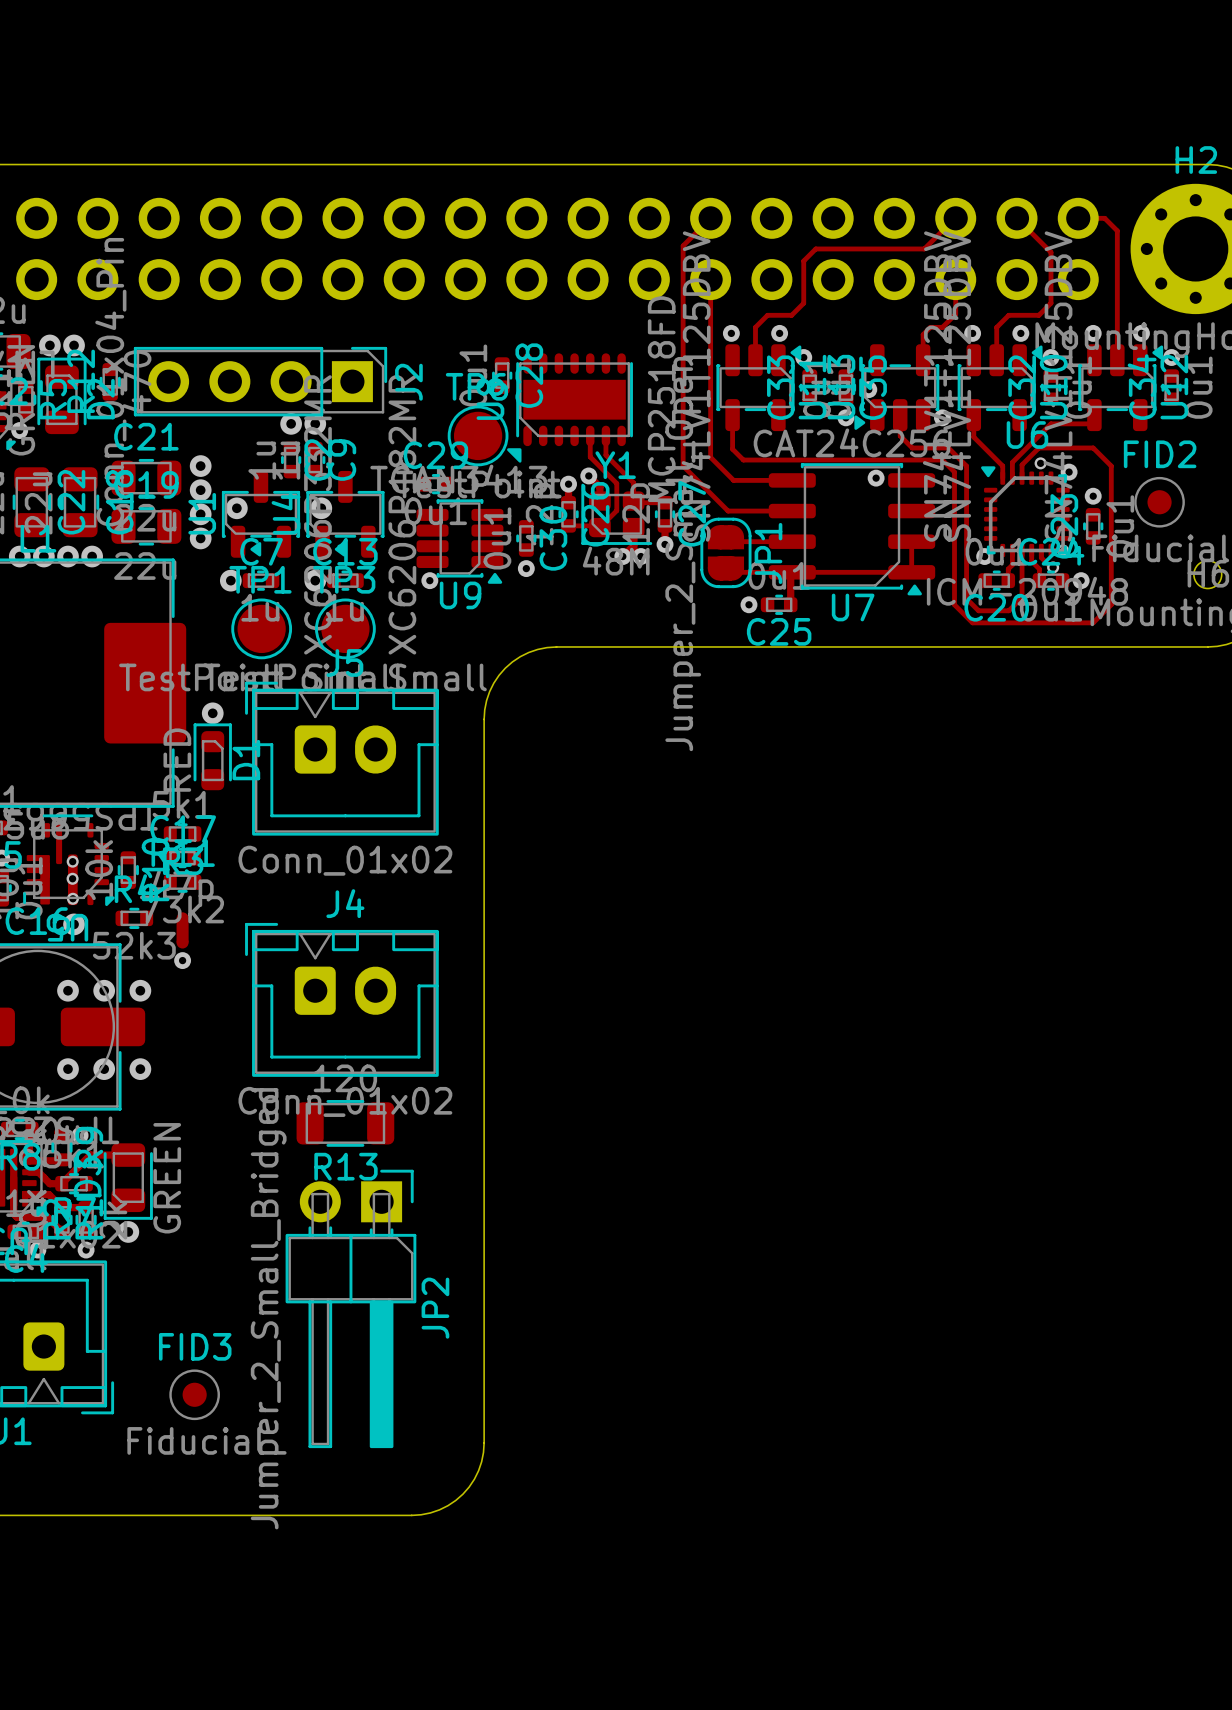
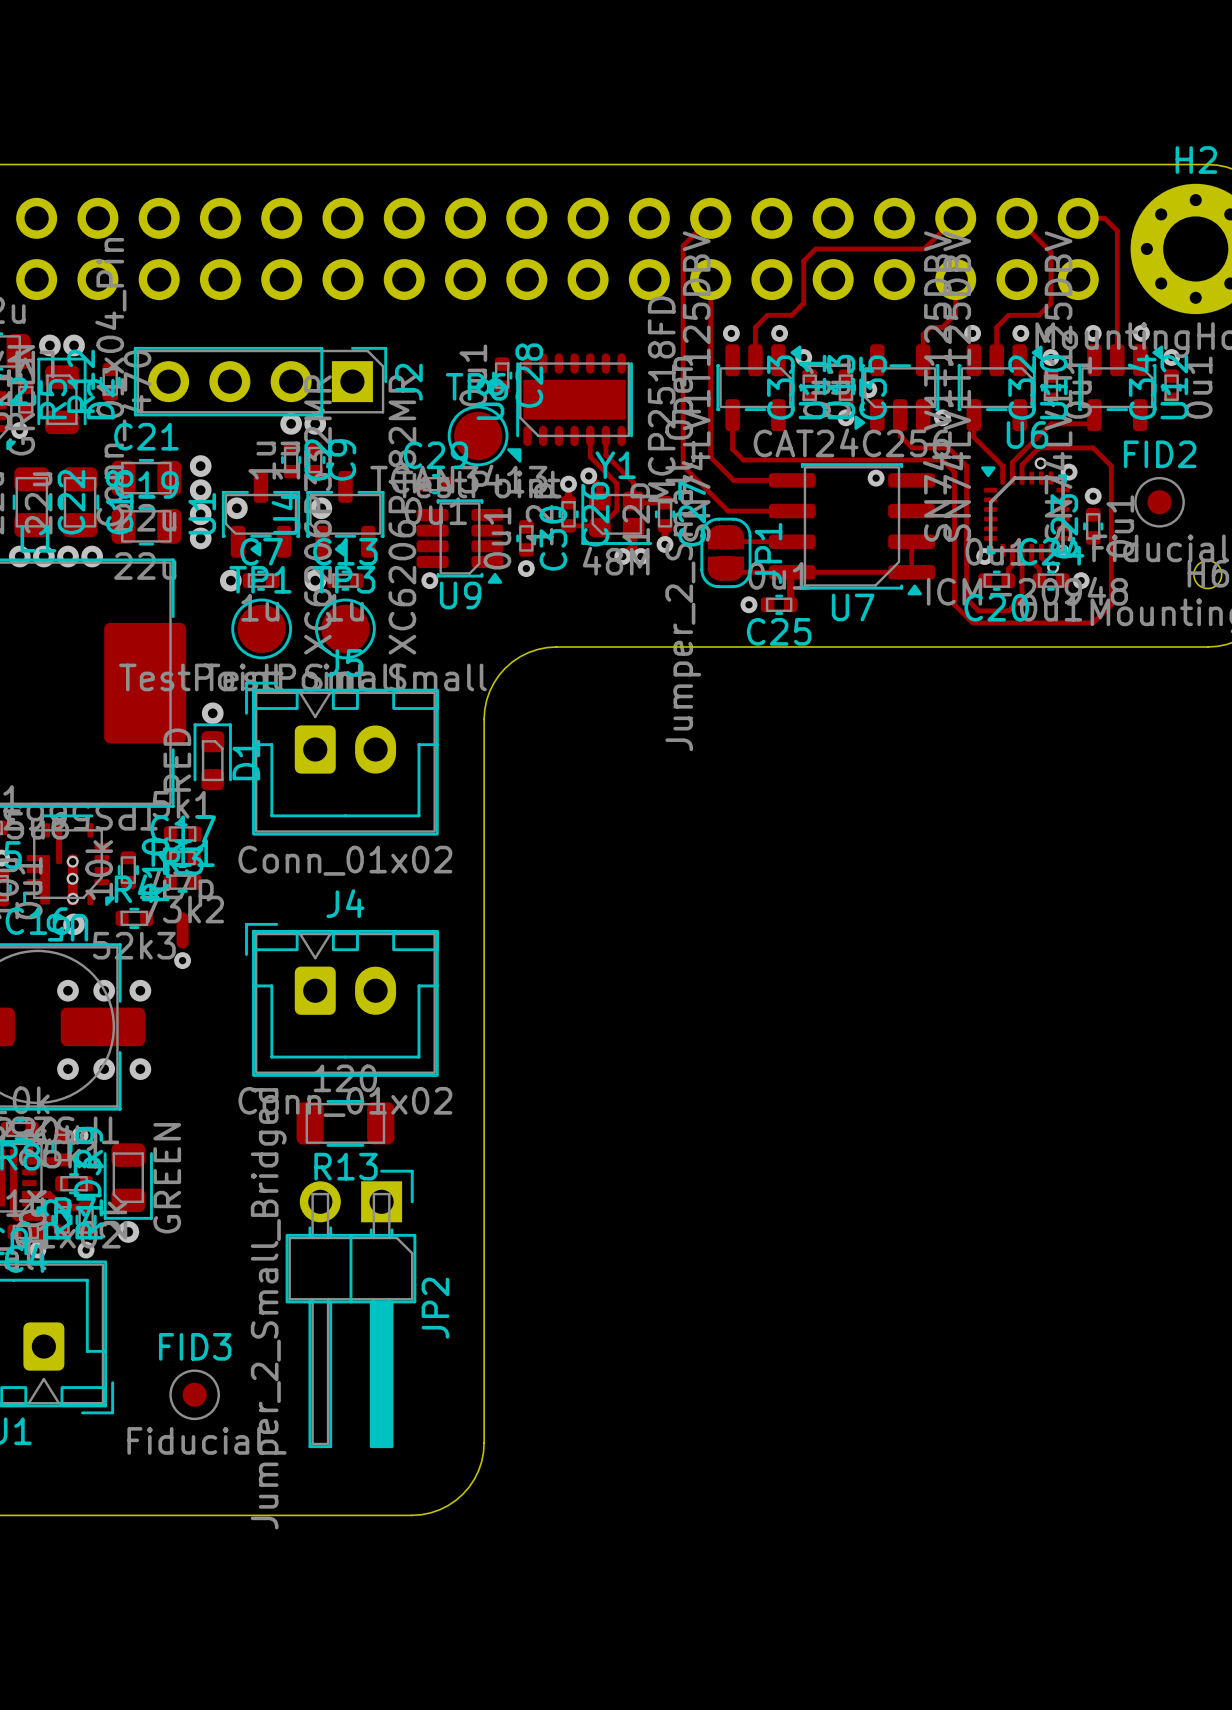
track: (128, 1155) (90, 1155) (61, 1183) (49, 1183) (38, 1172) (29, 1172) -> none

